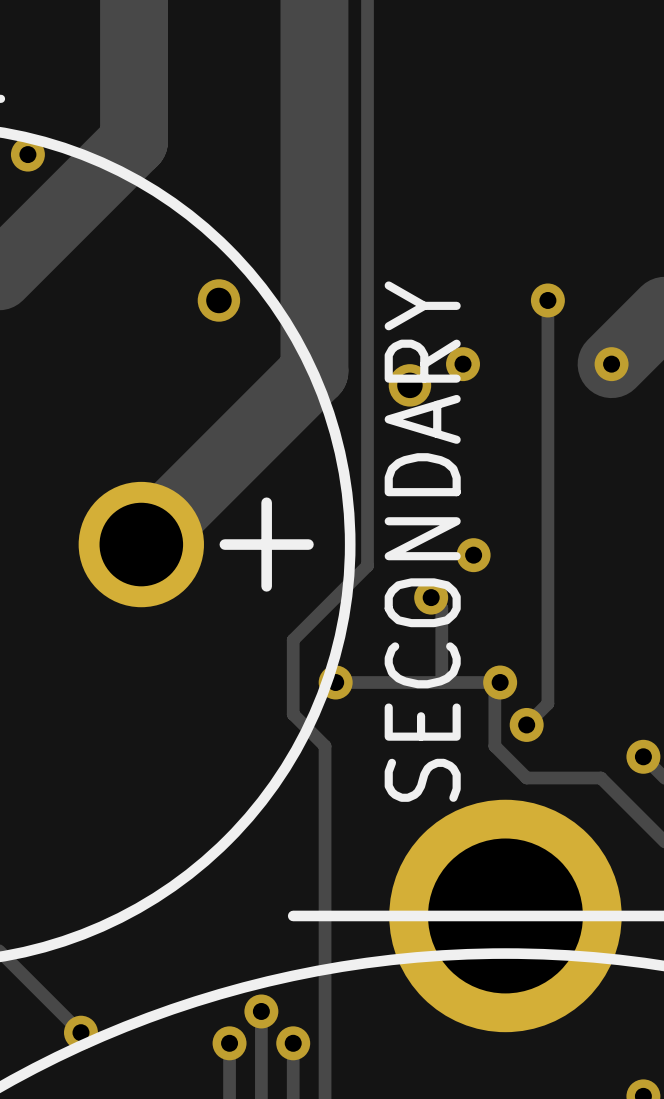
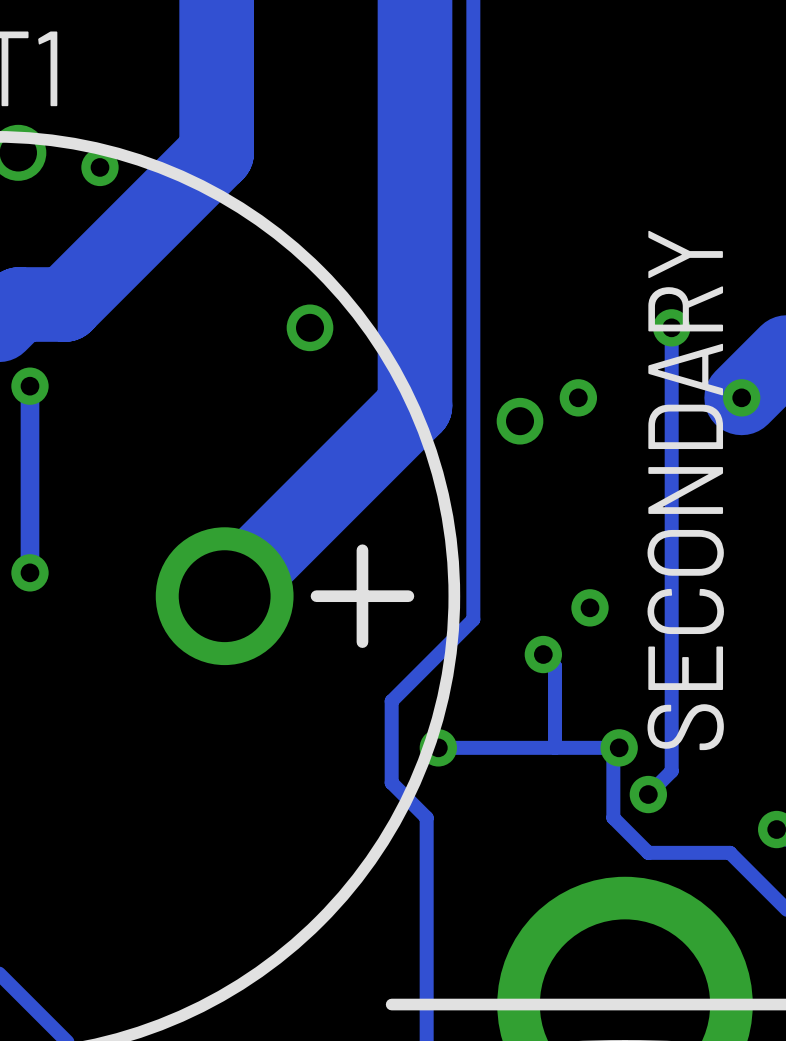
text position: SECONDARY (422, 541) -> SECONDARY (685, 490)

